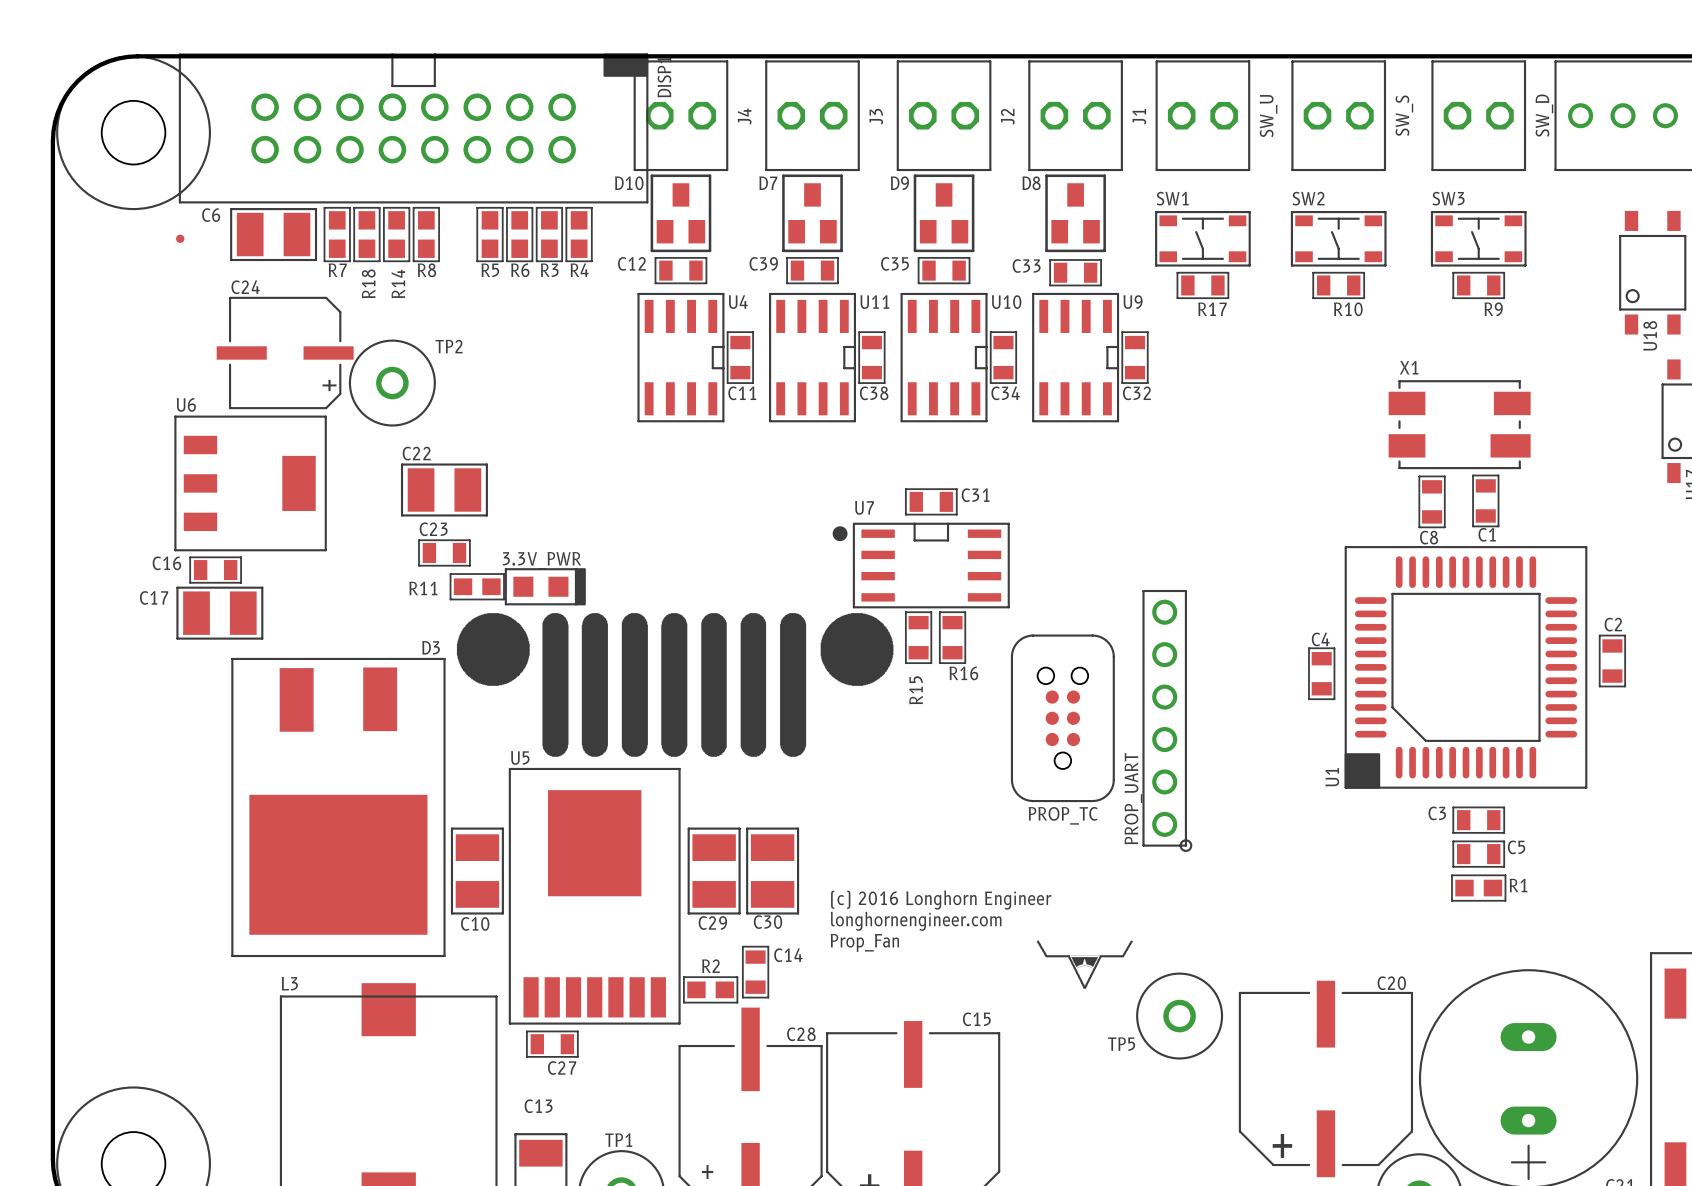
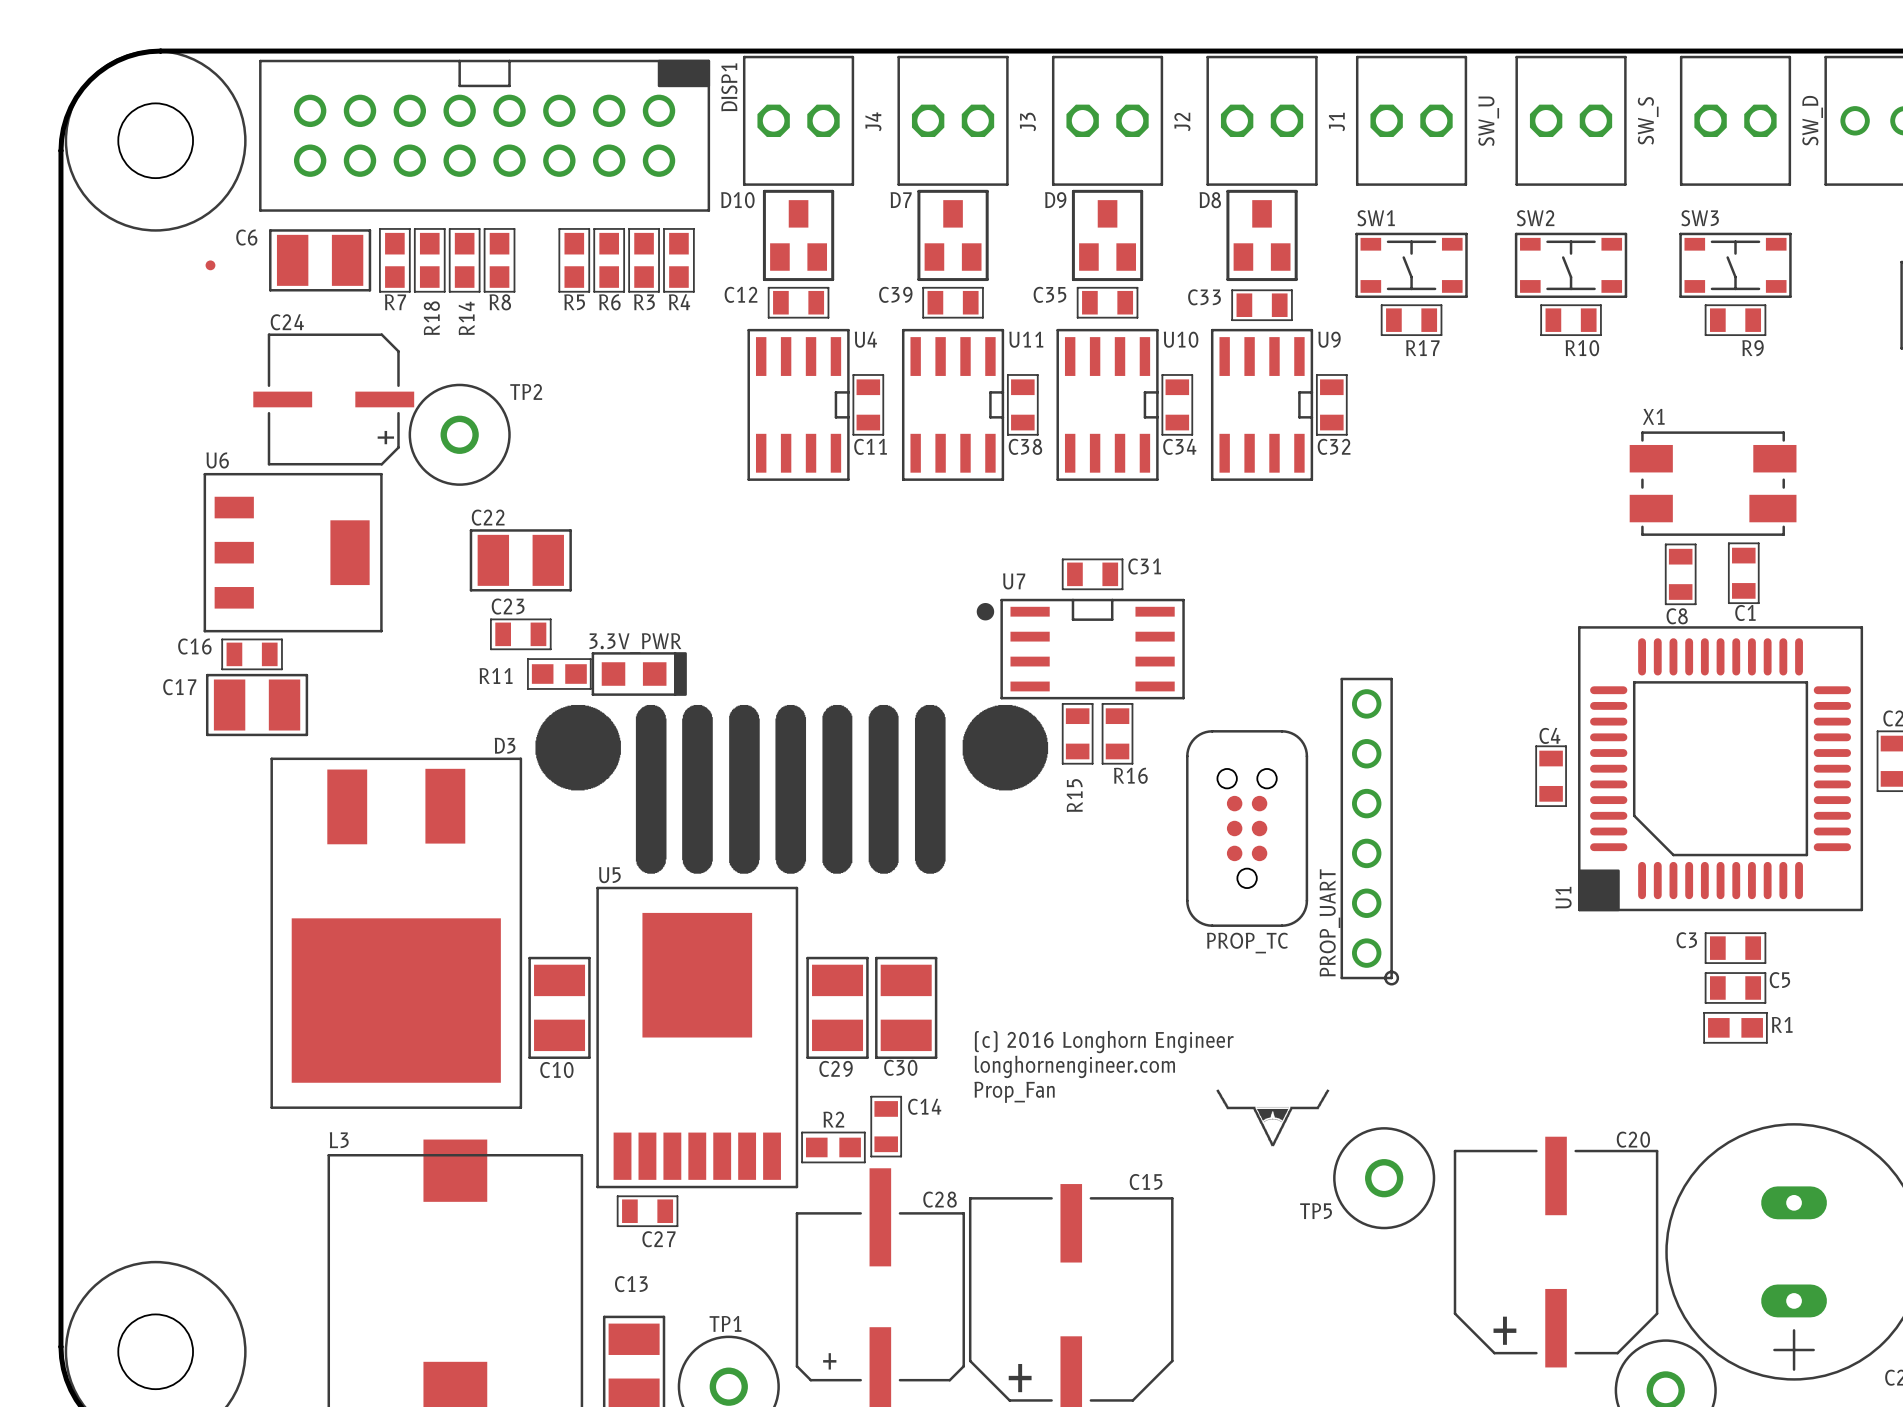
DISP1 footprint: [178, 53, 649, 204] -> [259, 59, 711, 212]
DISP1 name position: DISP1 (664, 76) -> DISP1 (729, 87)

